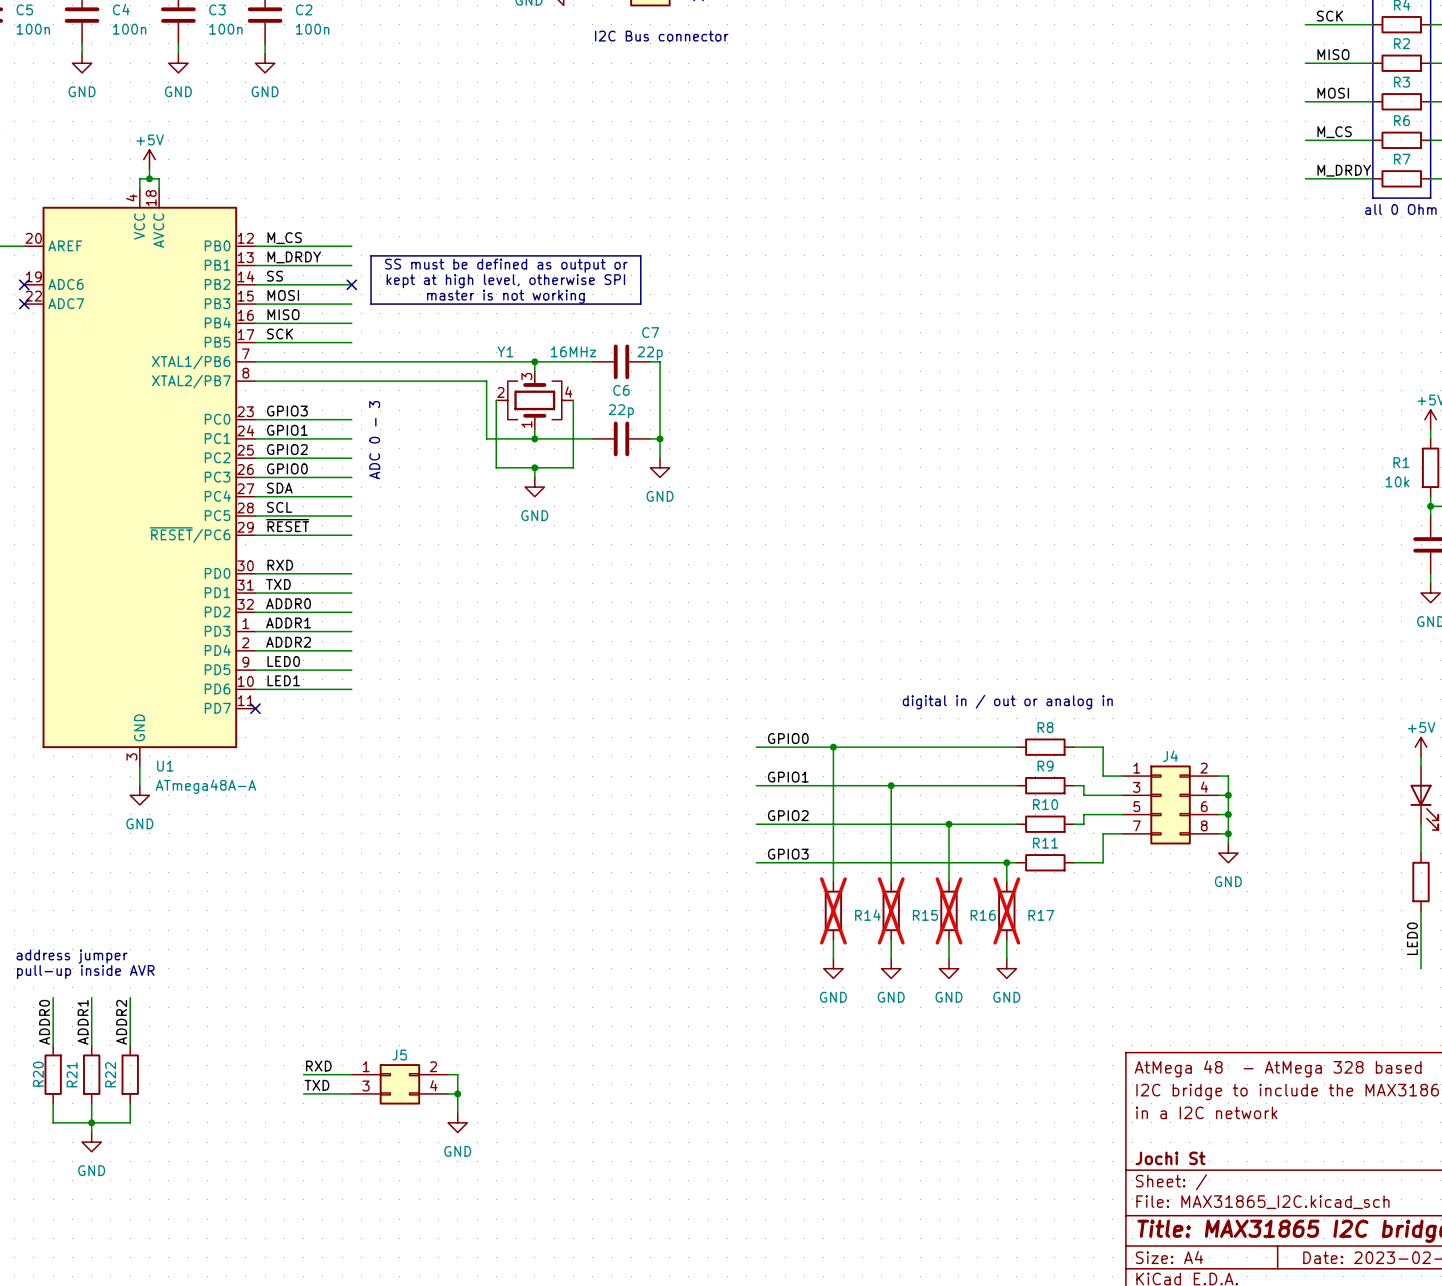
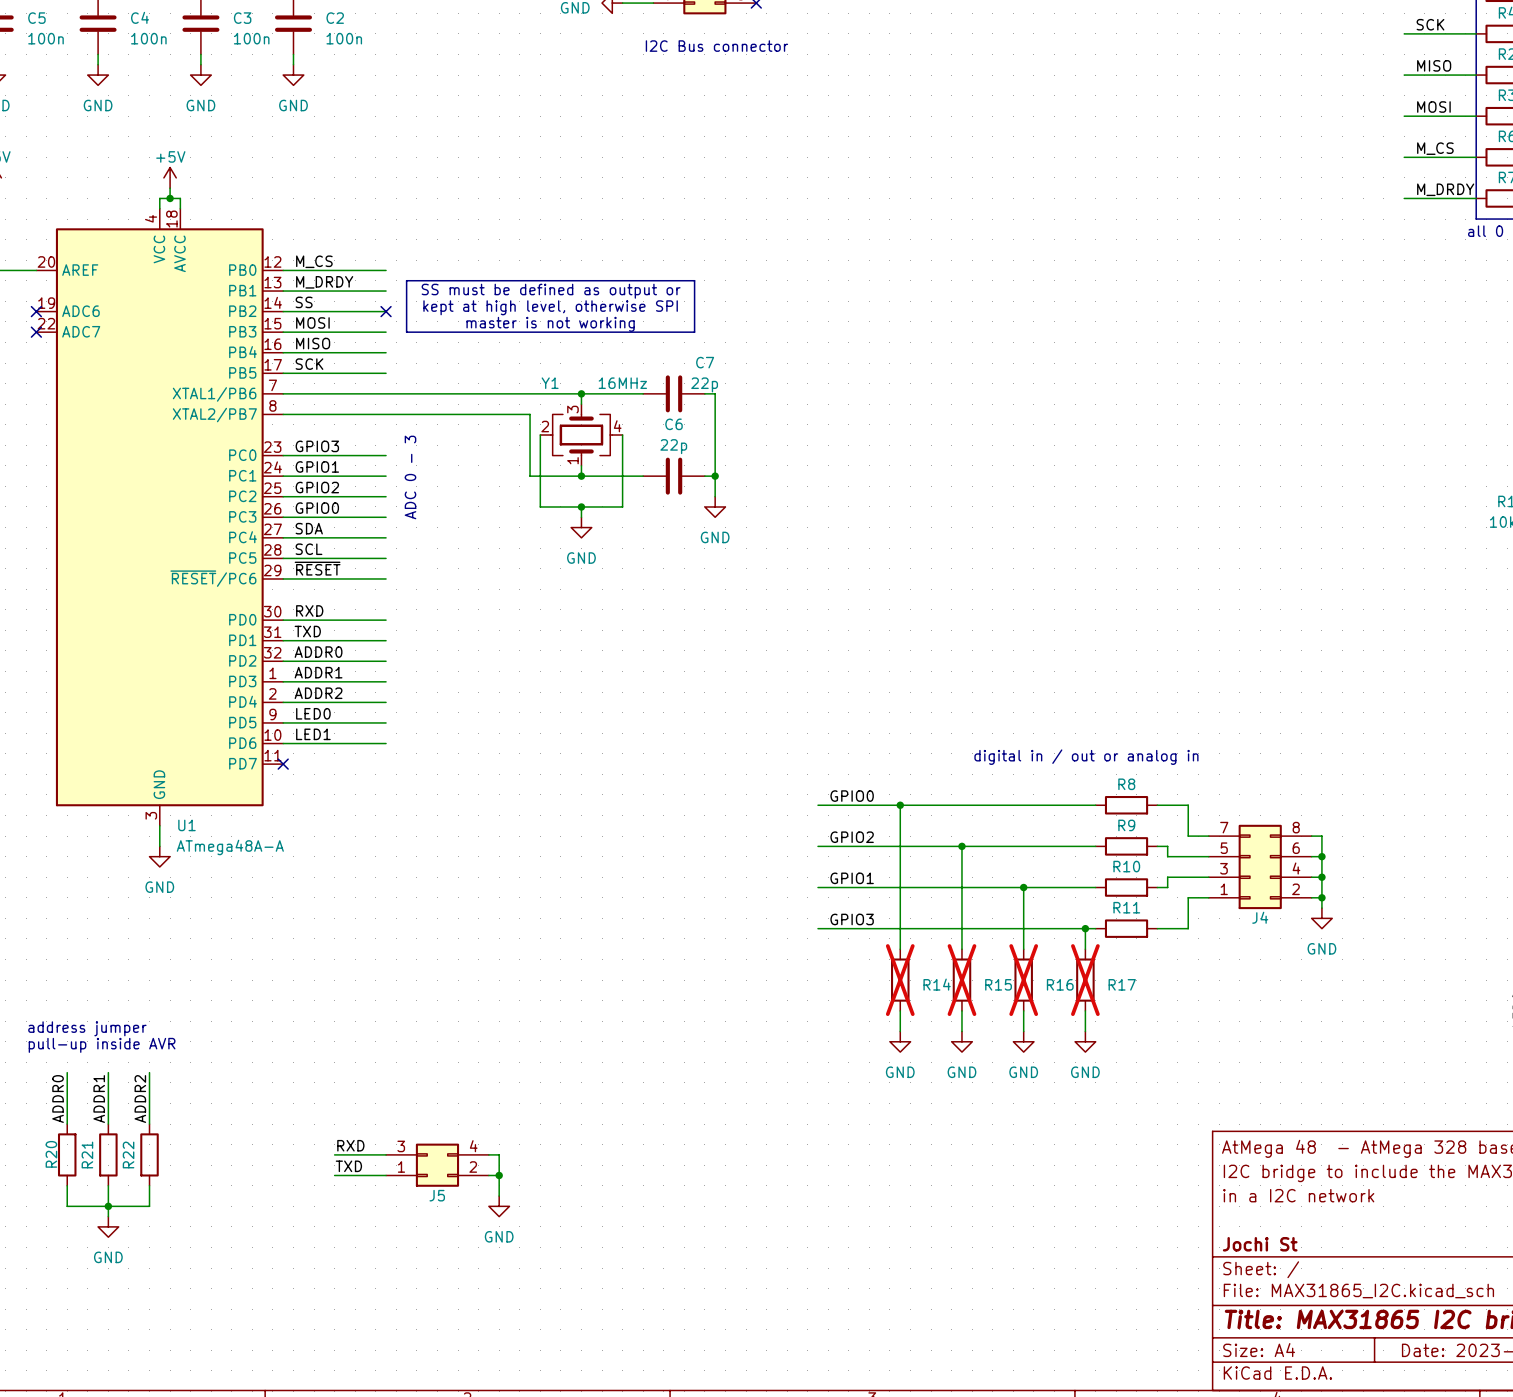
label: GPIO1 (788, 777) -> GPIO2 (852, 837)
J4 flip: as is (1170, 804) -> up-down (1260, 866)
label: GPIO2 (788, 815) -> GPIO1 (852, 878)
J5 flip: as is (399, 1084) -> up-down (437, 1165)

